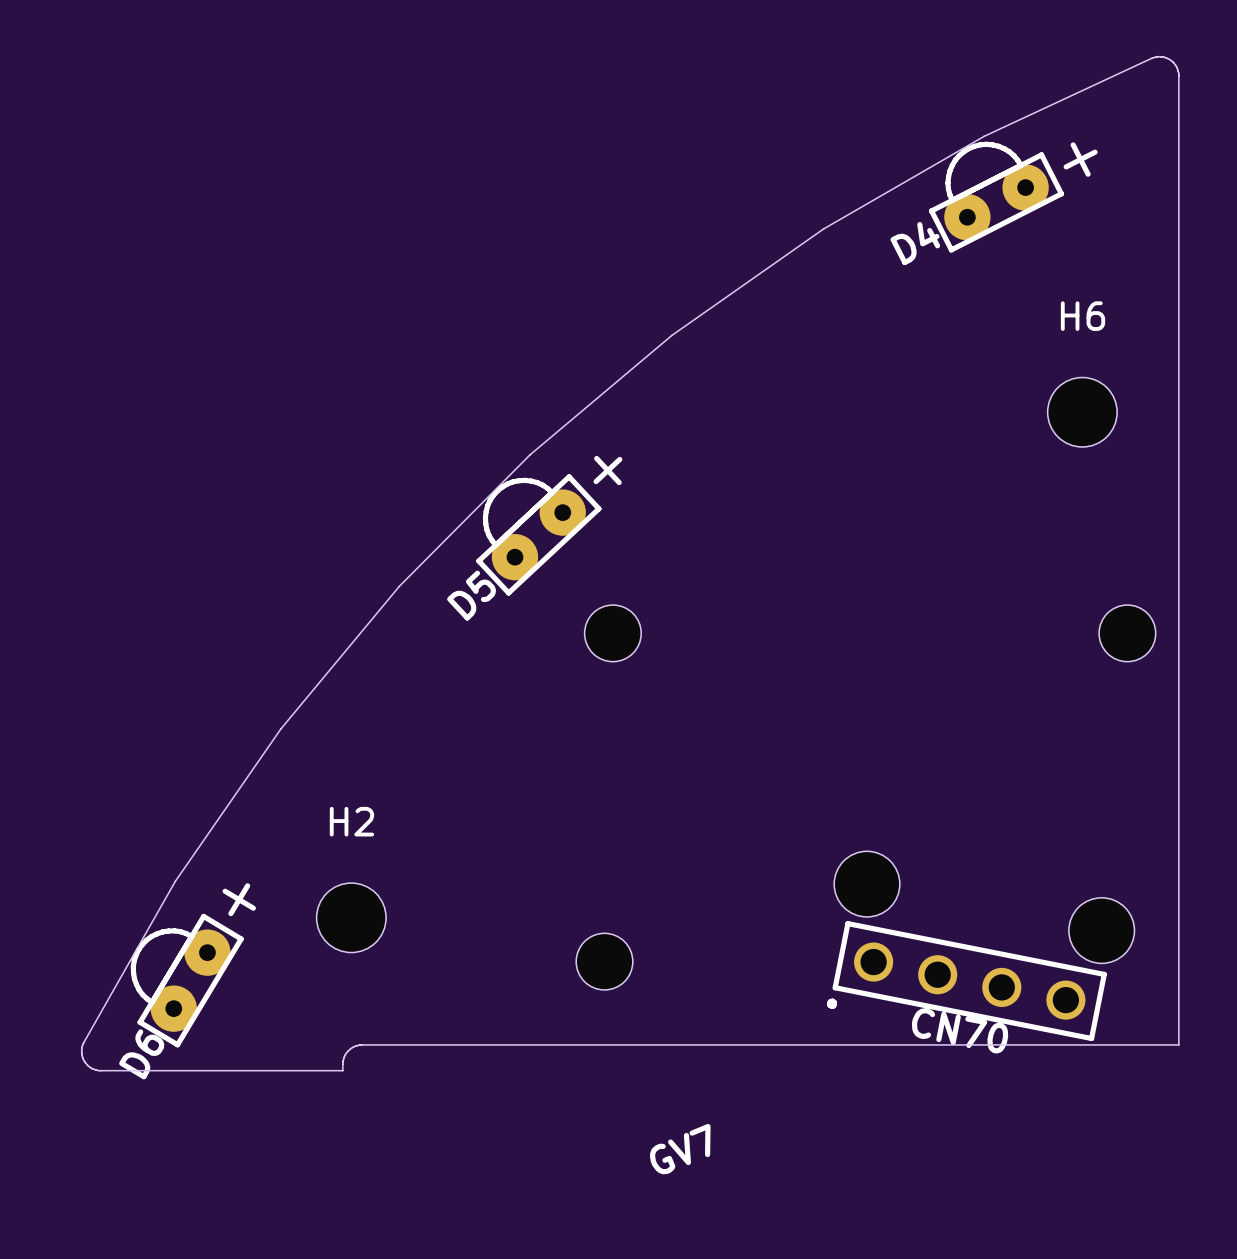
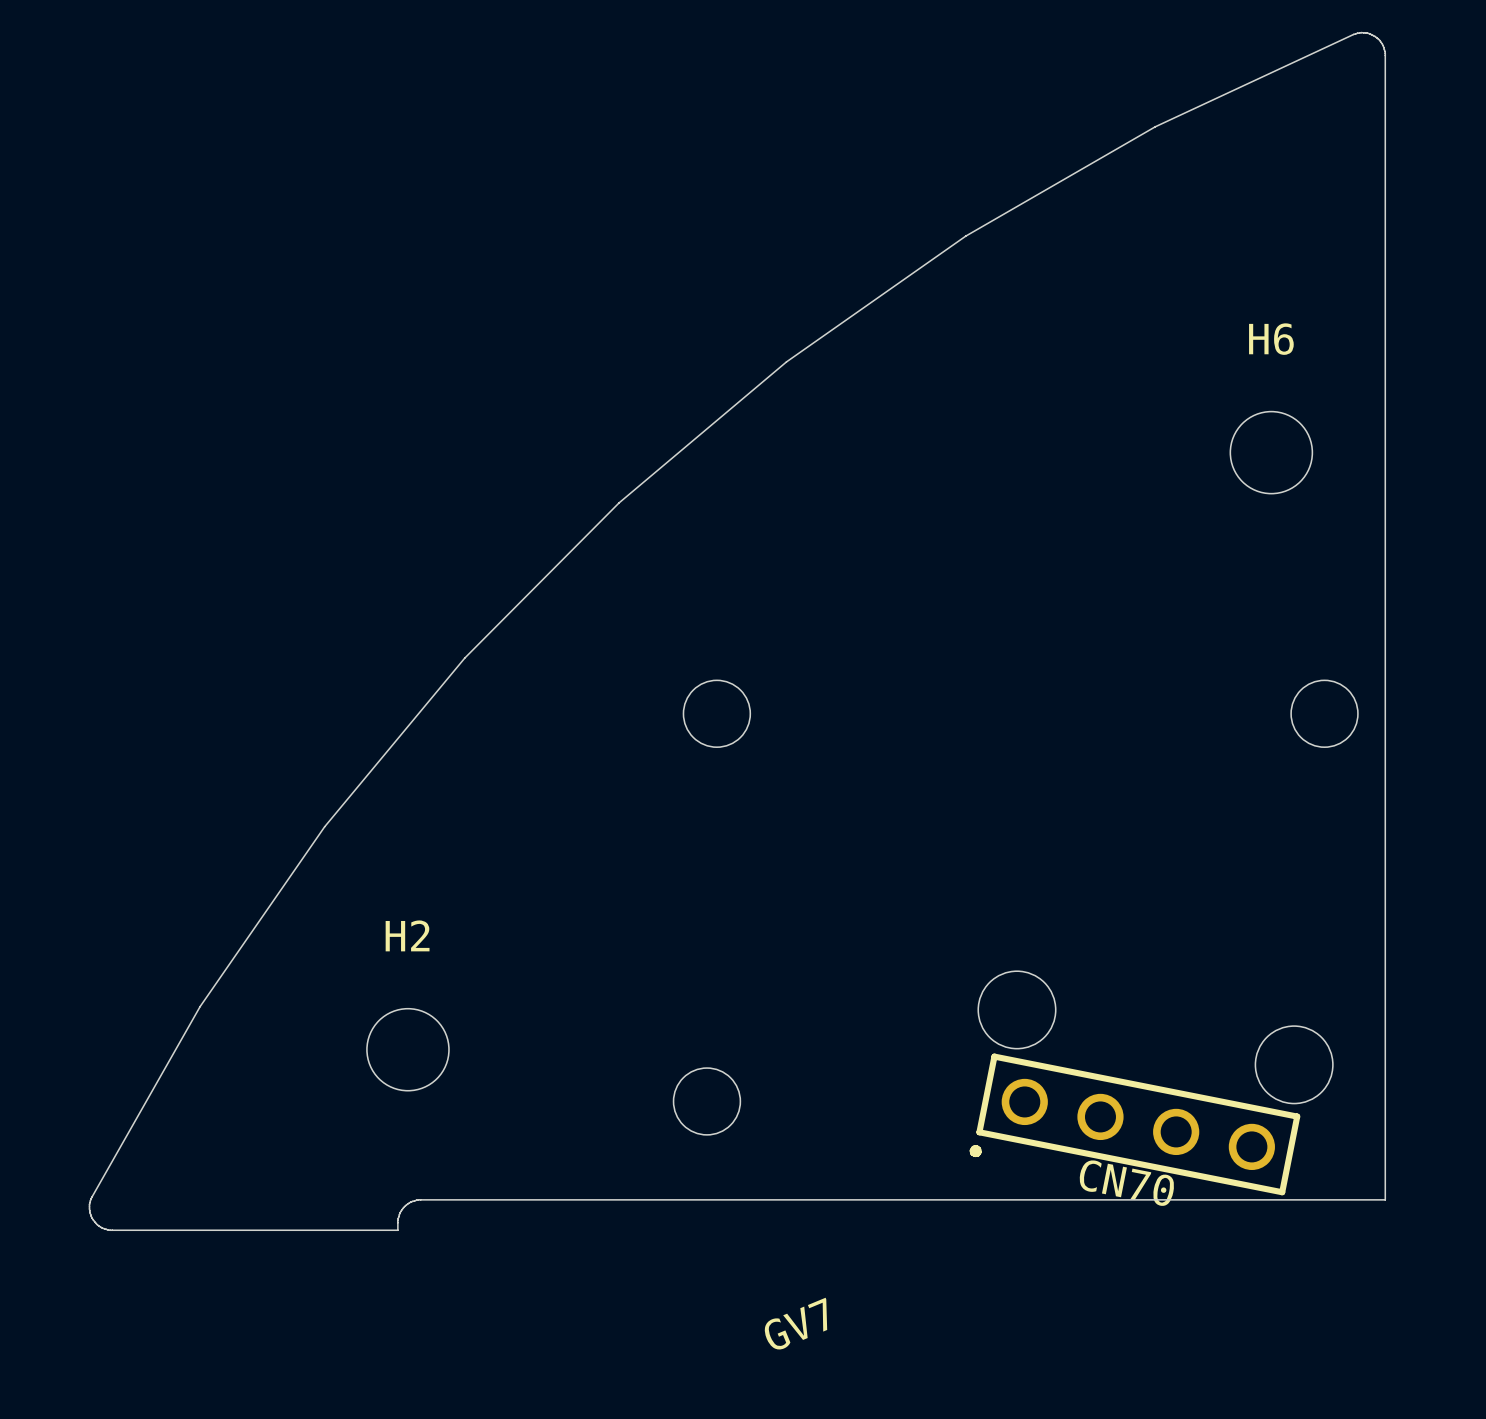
D4: (1013, 197) -> none
D5: (549, 525) -> none
D6: (193, 965) -> none

